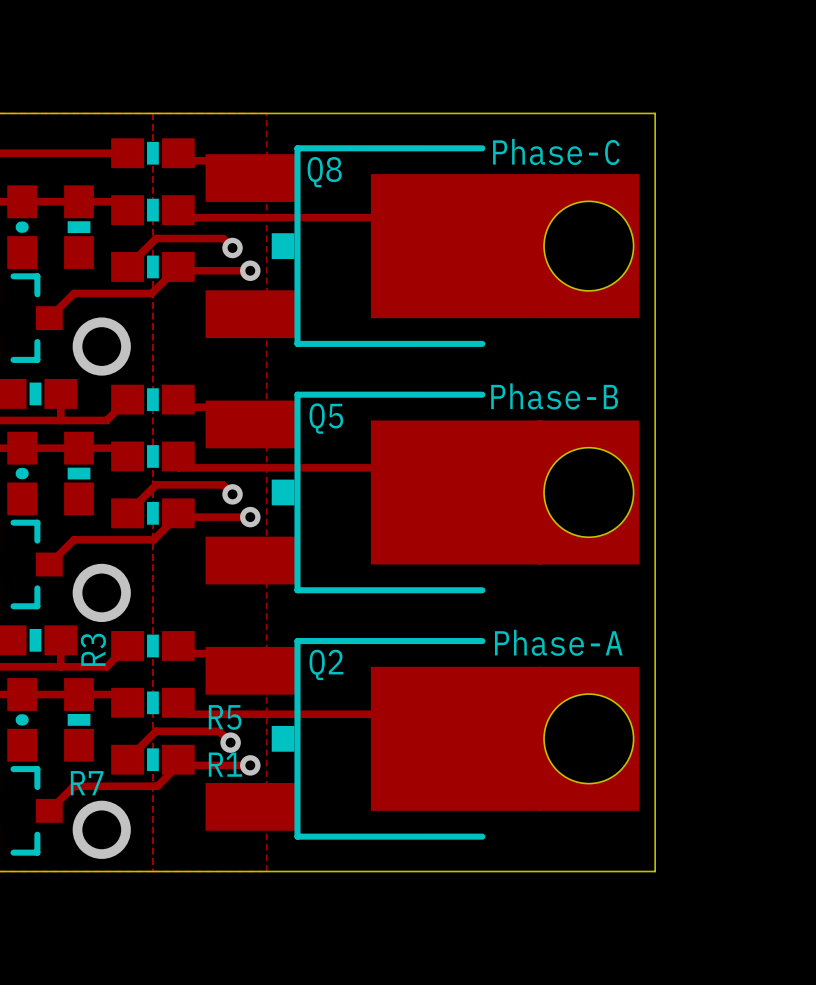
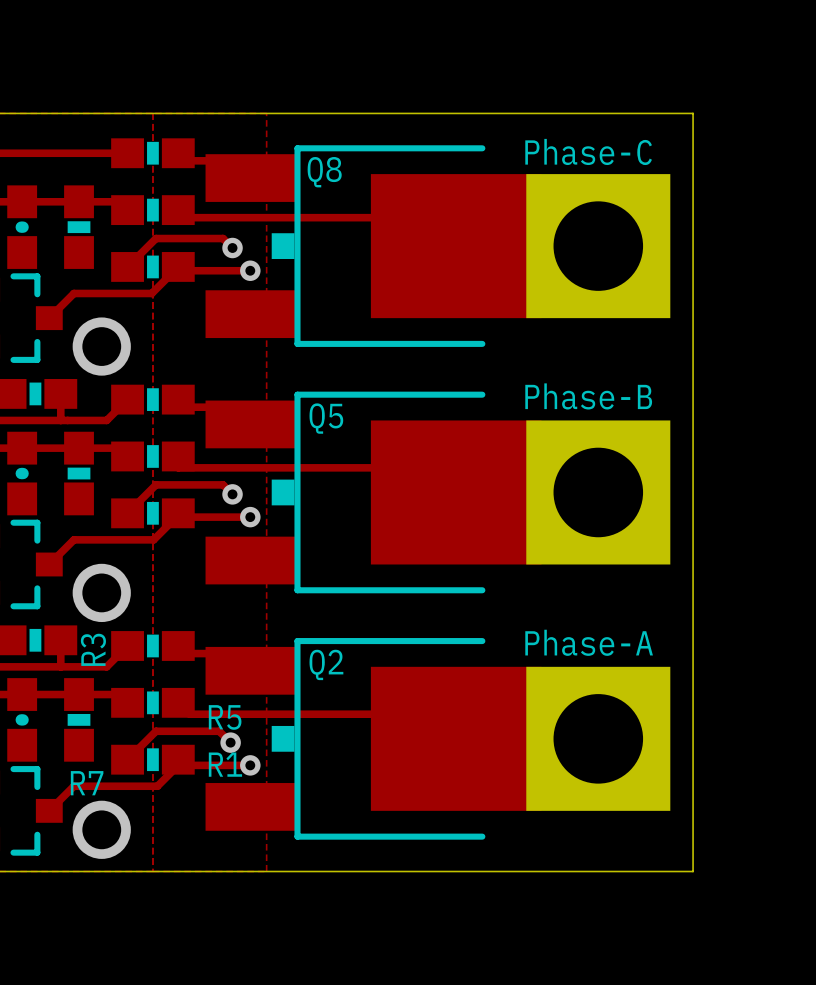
board edge: (655, 113) (655, 871) -> (655, 113) (693, 113) (693, 871) (655, 871)
text position: Phase-C (556, 151) -> Phase-C (588, 151)
part footprint: [538, 174, 640, 319] -> [526, 174, 671, 319]
text position: Phase-B (554, 396) -> Phase-B (588, 396)
part footprint: [538, 420, 640, 565] -> [526, 420, 671, 565]
text position: Phase-A (558, 642) -> Phase-A (589, 642)
part footprint: [538, 666, 640, 811] -> [526, 666, 671, 811]

